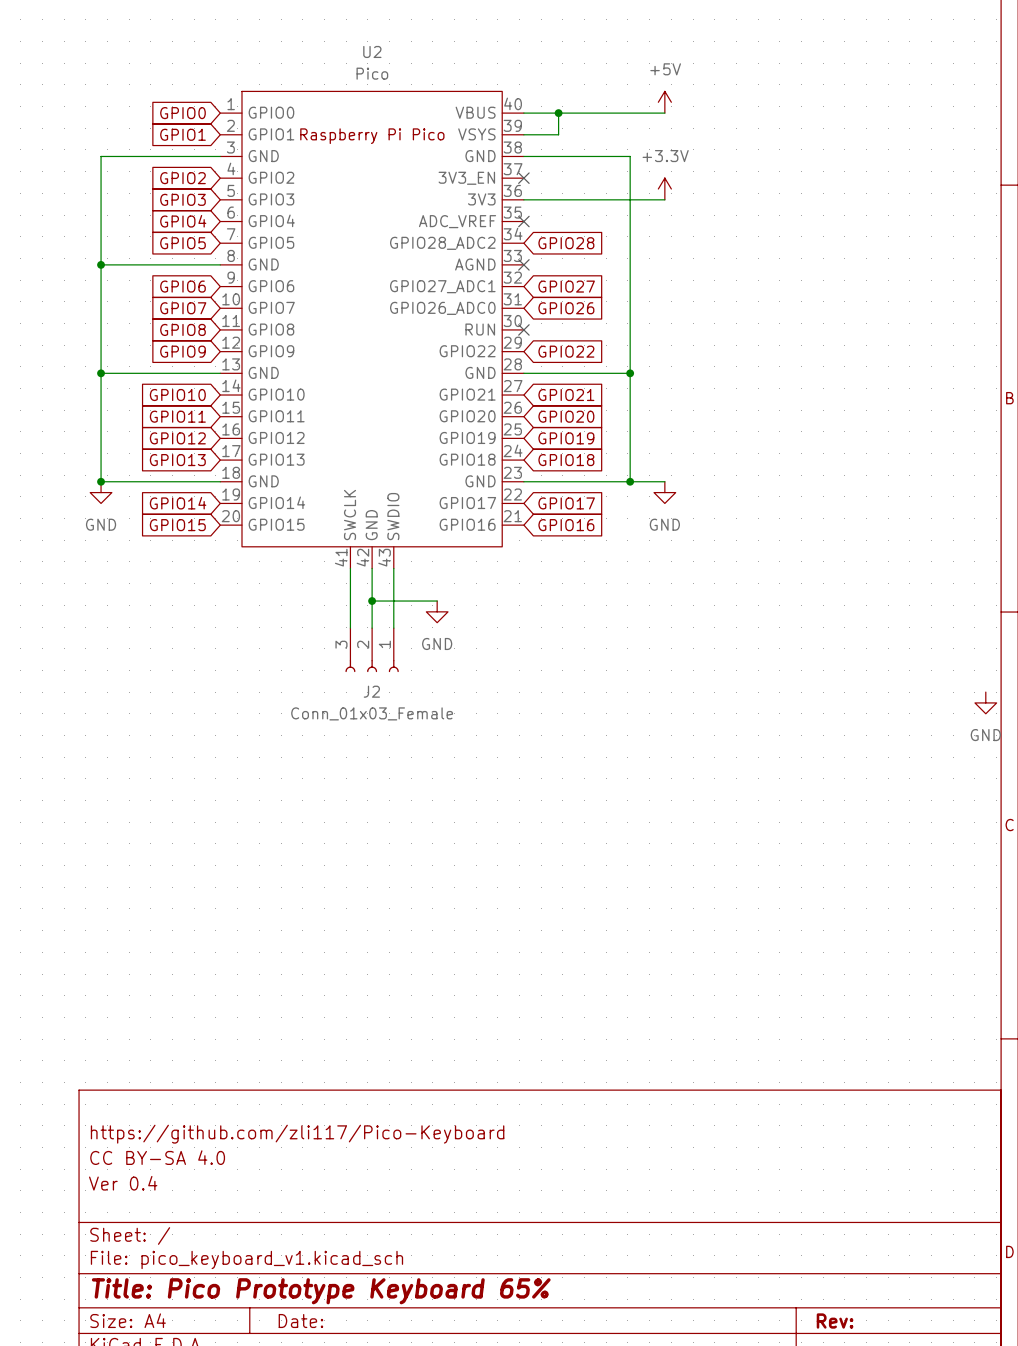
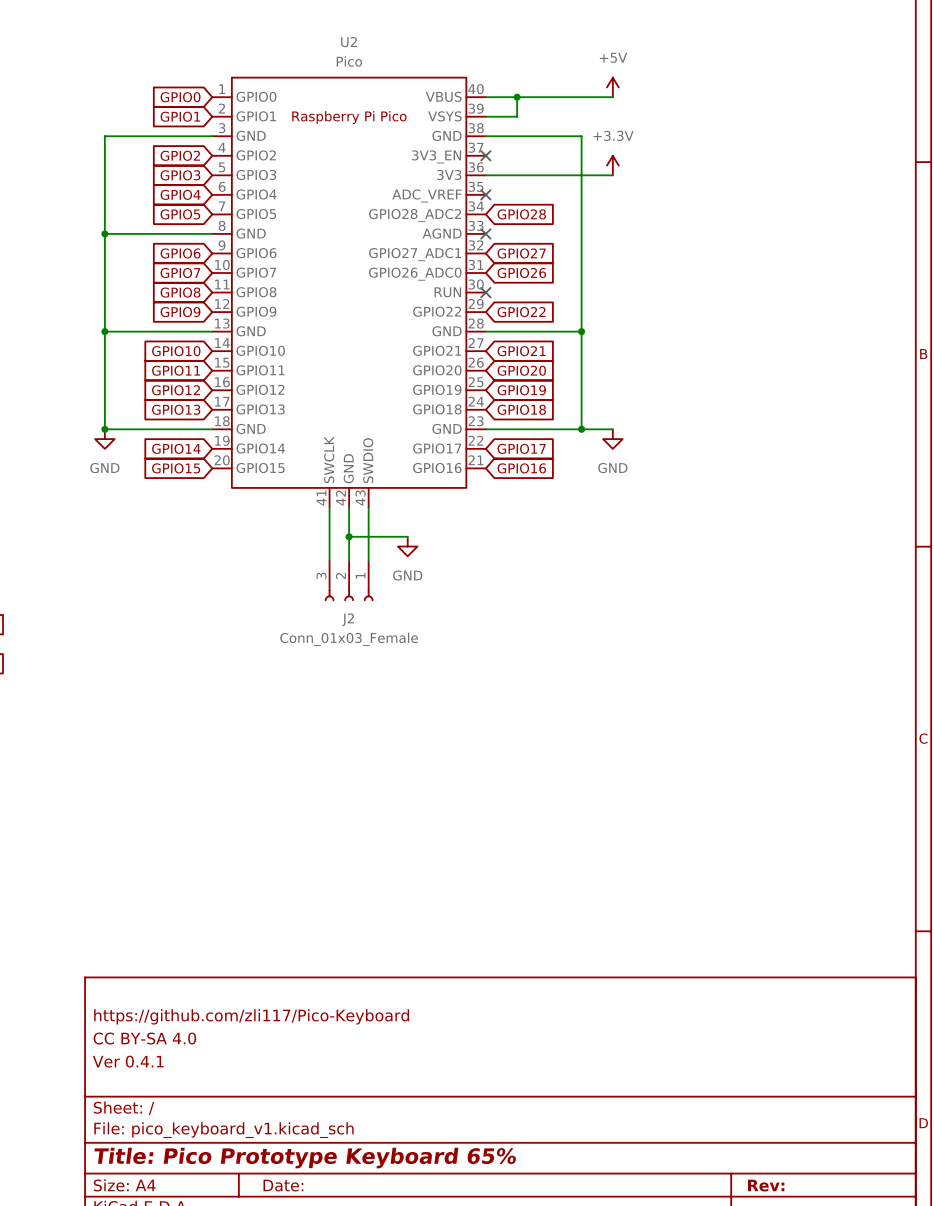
power symbol: GND (985, 702) -> none
title block: Ver 0.4 (123, 1183) -> Ver 0.4.1 (128, 1061)

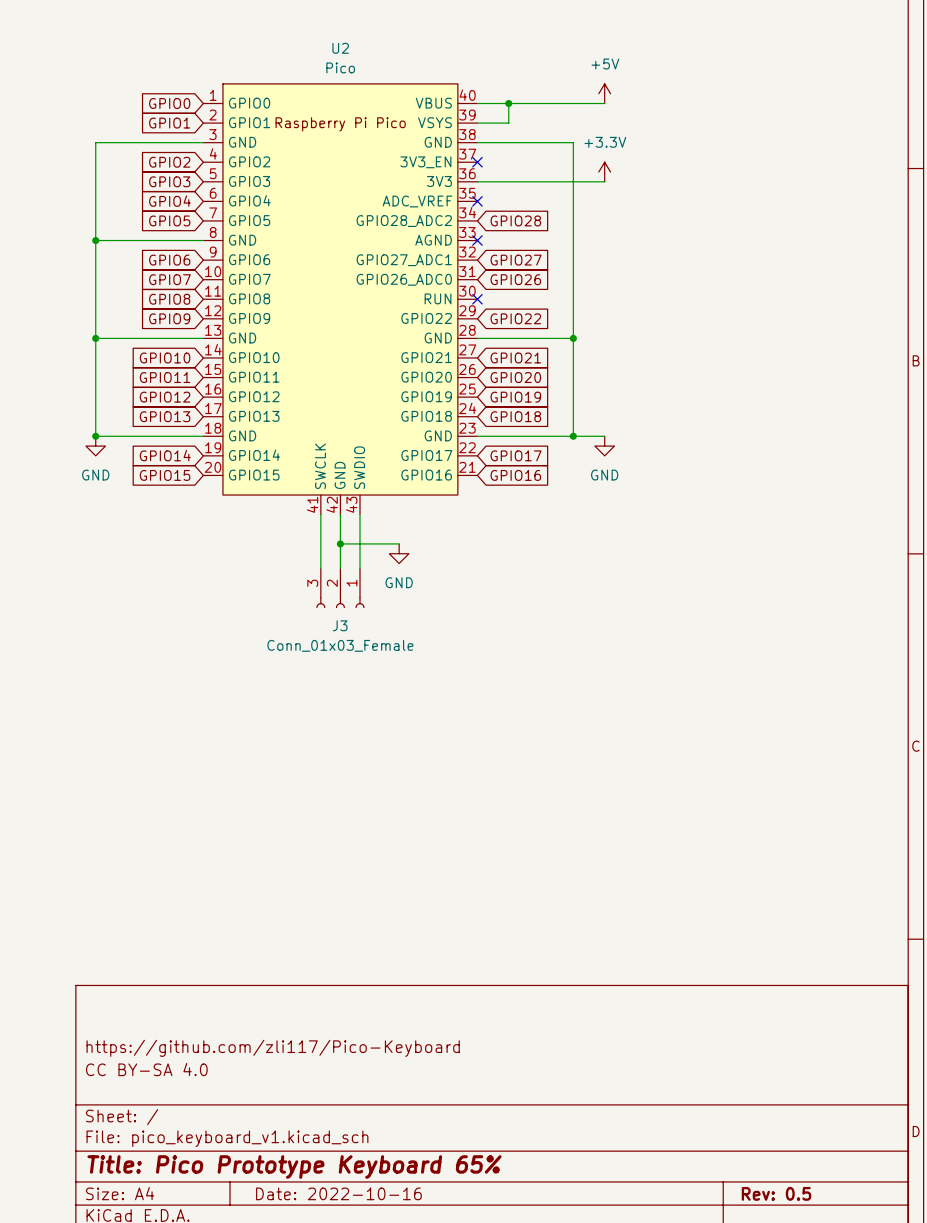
J2 name: J2 (348, 619) -> J3 (340, 625)
title block: https://github.com/zli117/Pico-Keyboard (251, 1016) -> none
title block: CC BY-SA 4.0 (144, 1038) -> https://github.com/zli117/Pico-Keyboard (273, 1048)
title block: Ver 0.4.1 (128, 1061) -> CC BY-SA 4.0 (146, 1069)
title block: Date: (283, 1185) -> Date: 2022-10-16 (338, 1193)
title block: Rev: (766, 1185) -> Rev: 0.5 (776, 1193)

